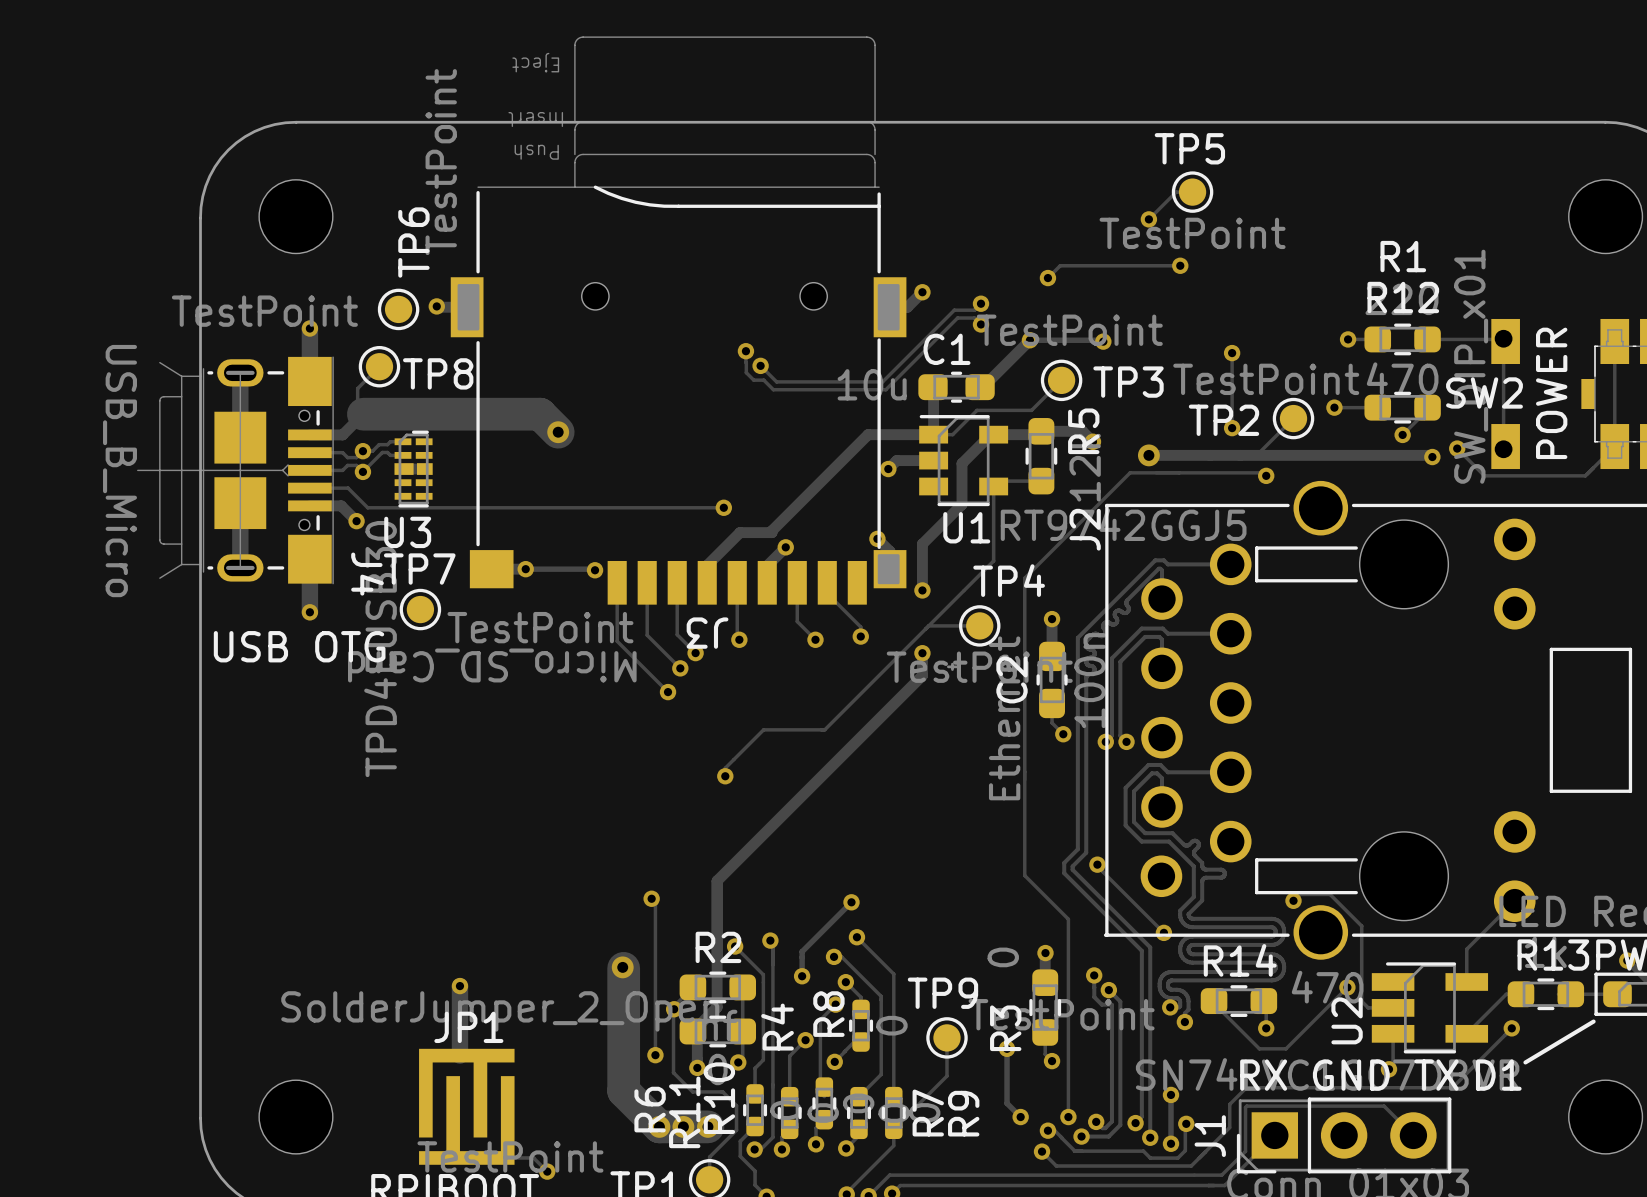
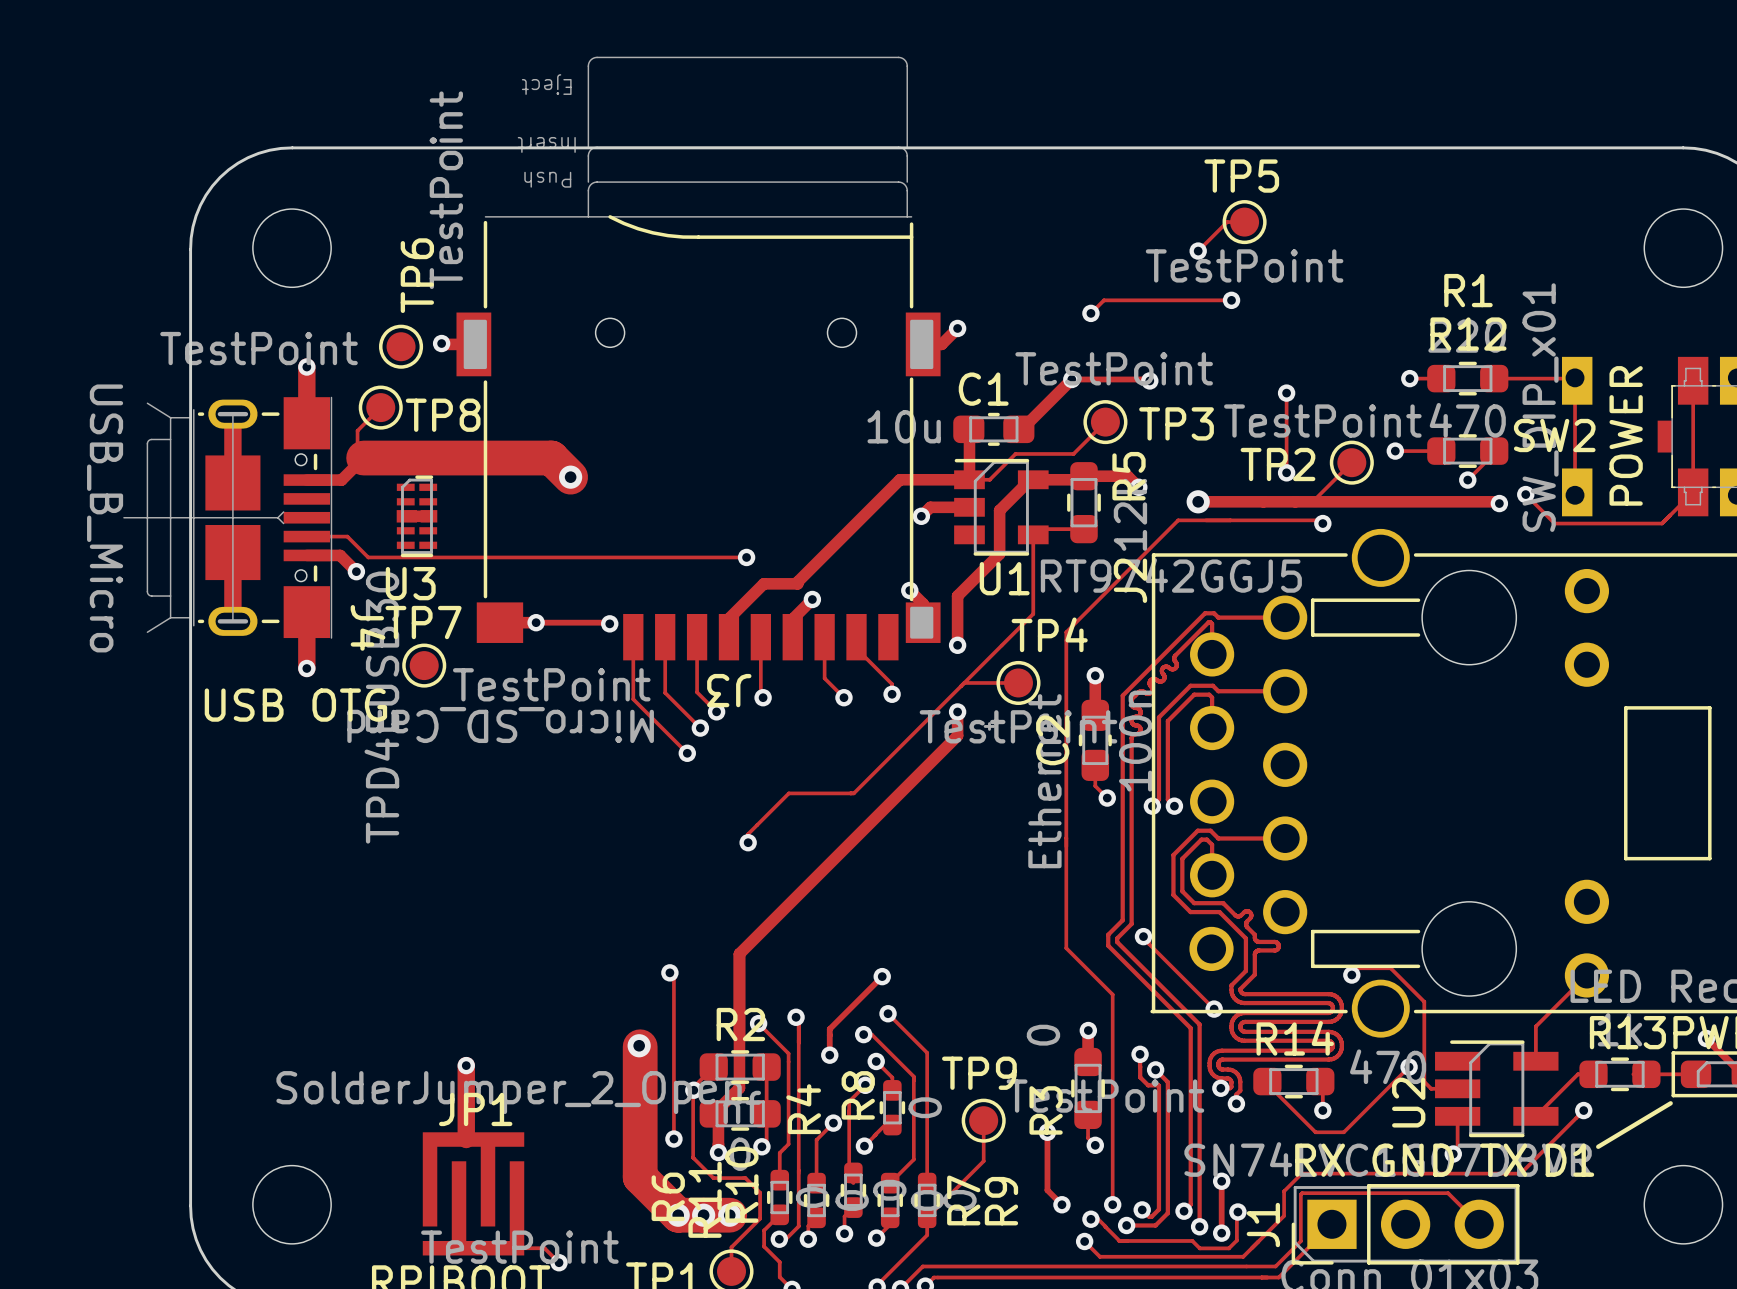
track: (981, 303) (974, 310) (954, 310) (882, 381) (776, 381) (760, 365) -> none
via: (981, 303) -> none
track: (981, 324) (974, 318) (957, 318) (885, 389) (773, 389) (763, 380) (753, 380) (746, 372) (746, 362) -> none
via: (981, 324) -> none
via: (745, 351) -> none
via: (760, 365) -> none
track: (403, 441) (390, 441) (387, 444) (379, 444) (372, 451) (362, 451) (356, 457) (347, 457) (342, 452) (309, 452) -> none
via: (362, 451) -> none
track: (403, 455) (390, 455) (387, 452) (382, 452) (362, 471) (356, 465) (347, 465) (342, 470) (309, 470) -> none
via: (362, 471) -> none

